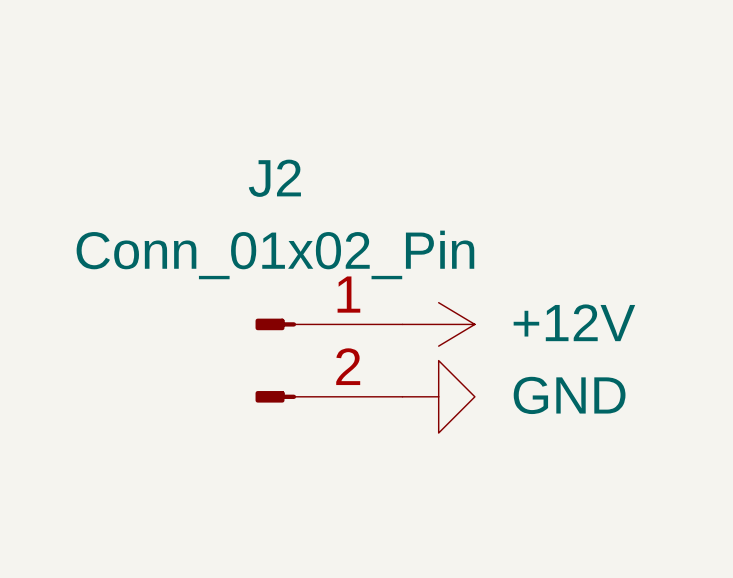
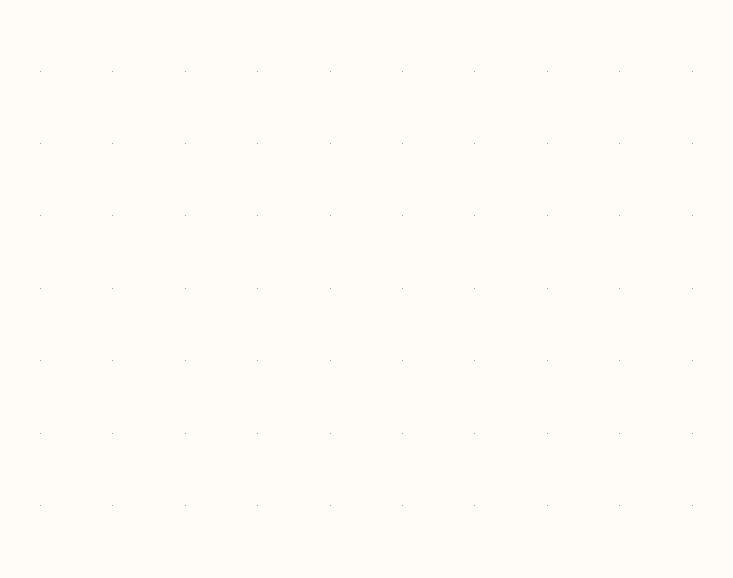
power symbol: +12V (438, 324) -> none
J2: Conn_01x02_Pin (329, 360) -> none
power symbol: GND (438, 396) -> none

